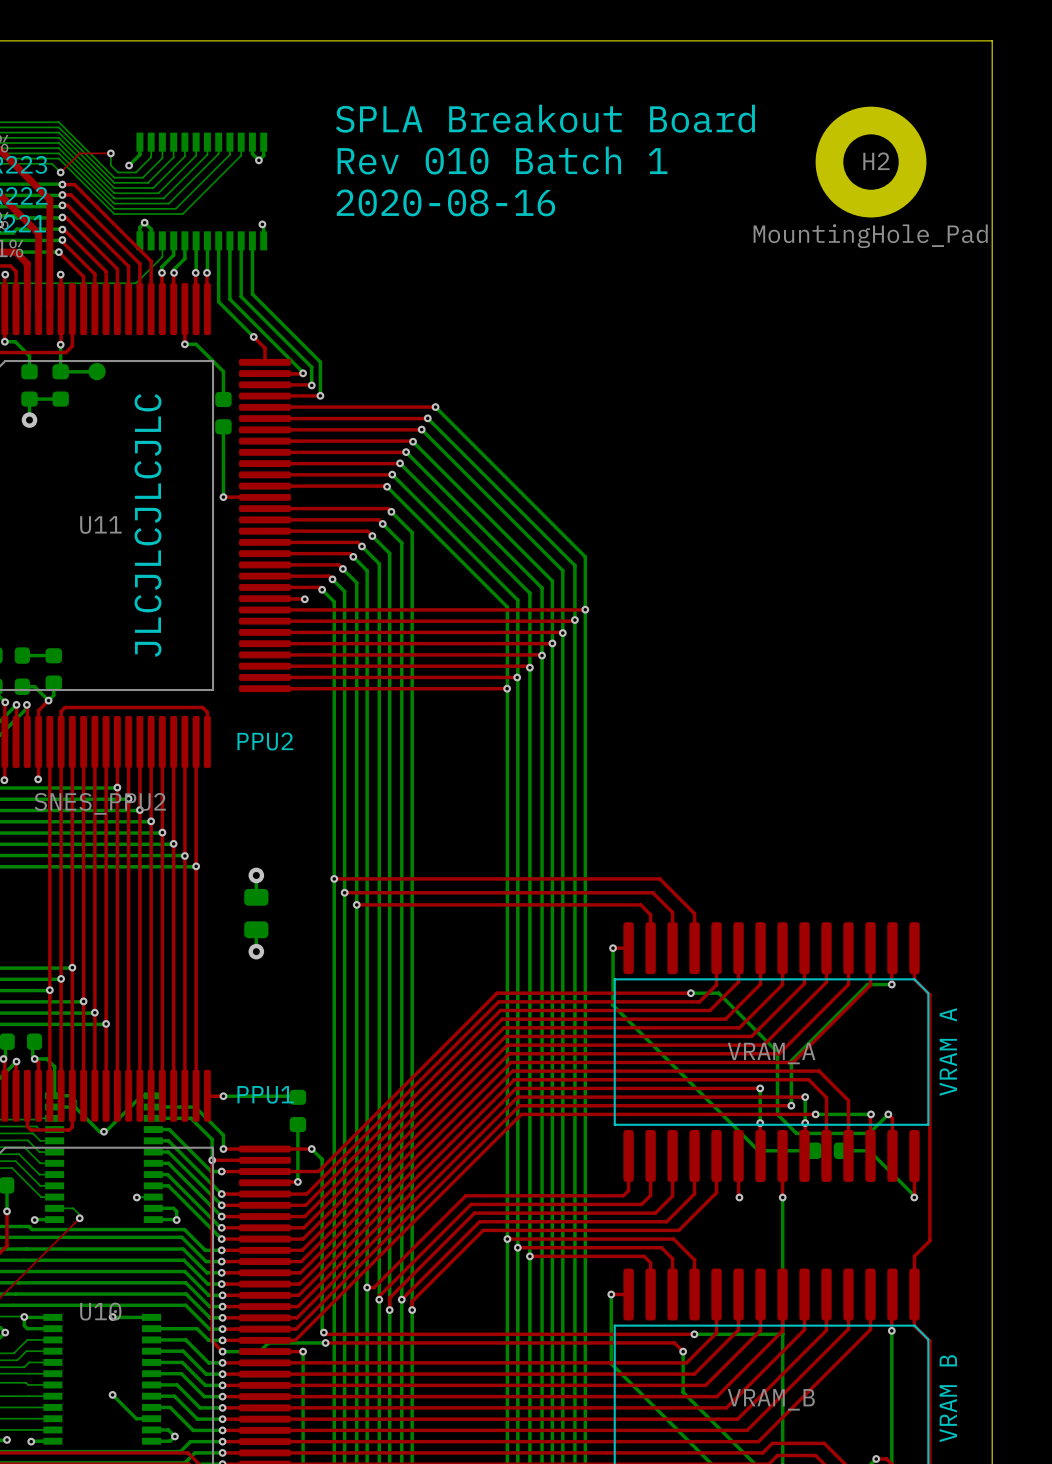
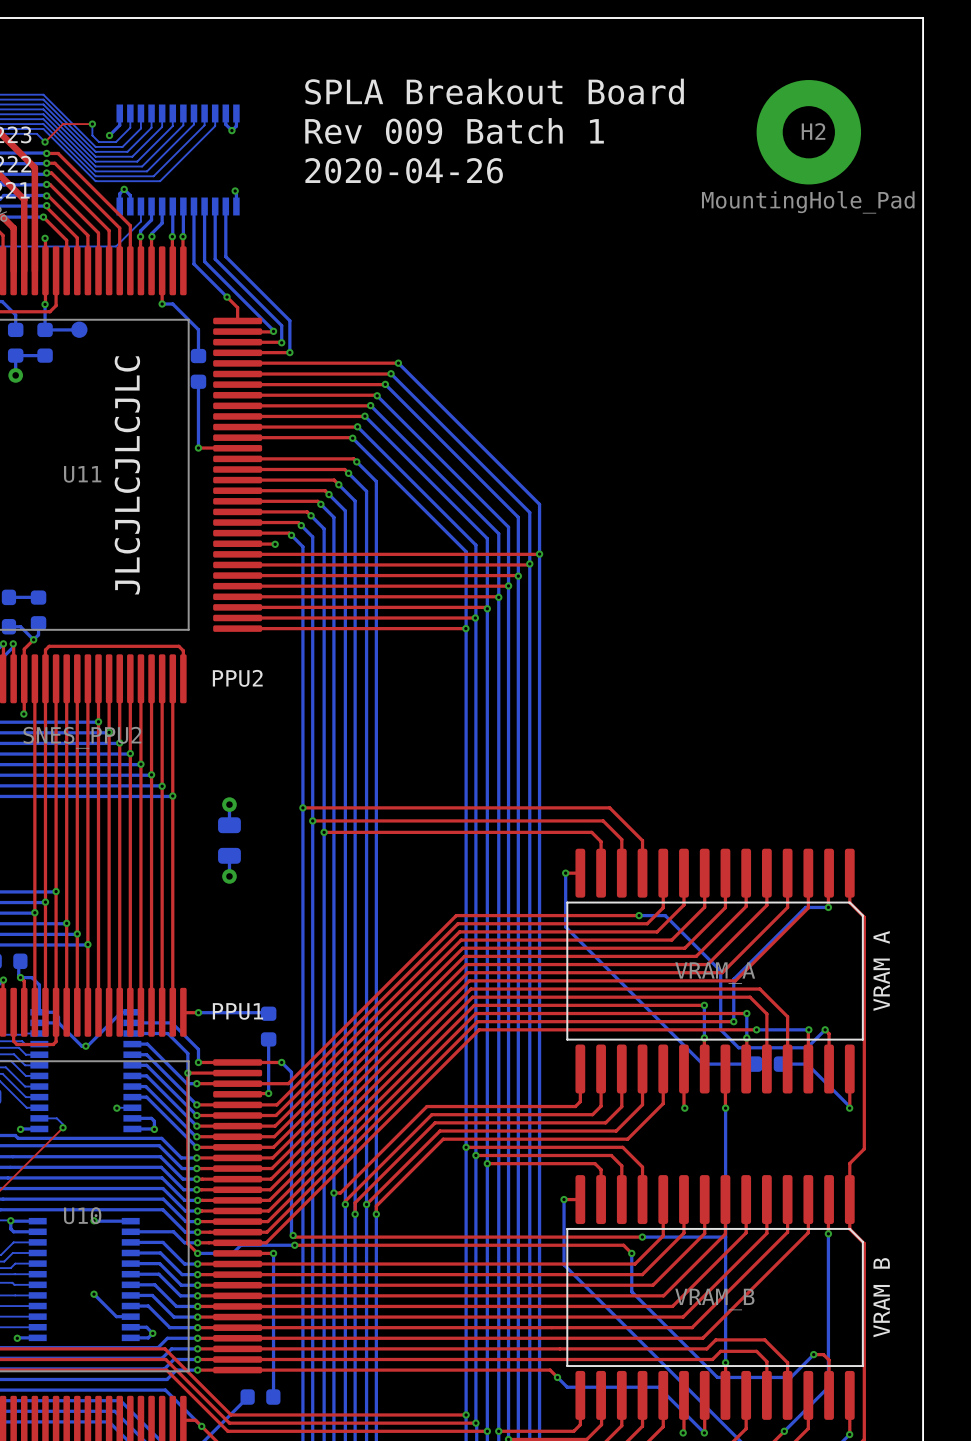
text: Rev 010 Batch 1 (502, 160) -> Rev 009 Batch 1 (454, 131)
text: 2020-08-16 (445, 202) -> 2020-04-26 (404, 170)

